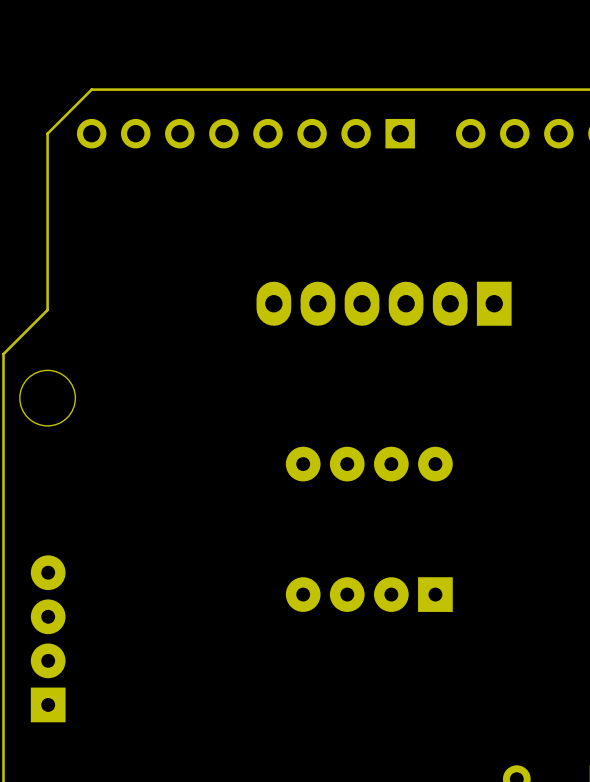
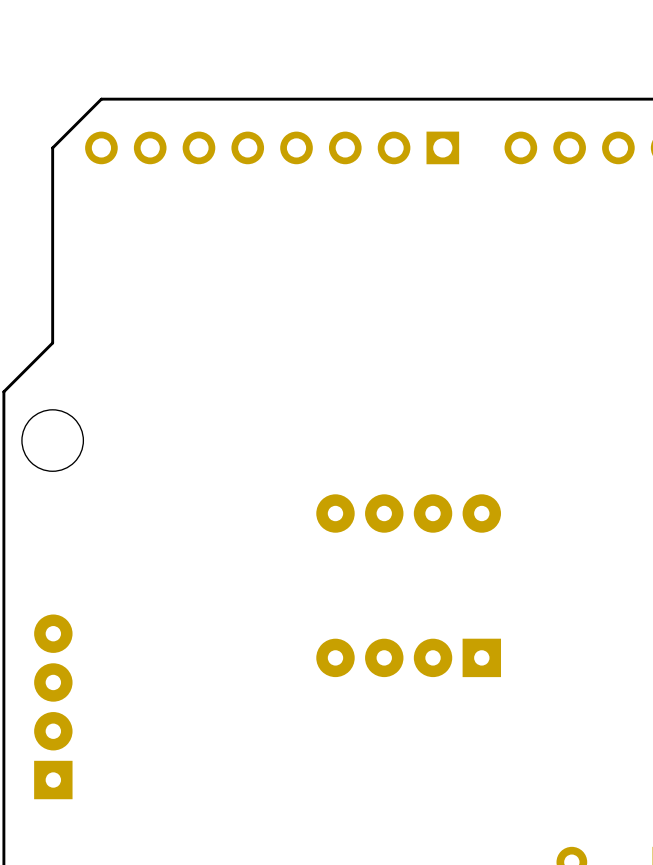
part: (384, 303) -> none

